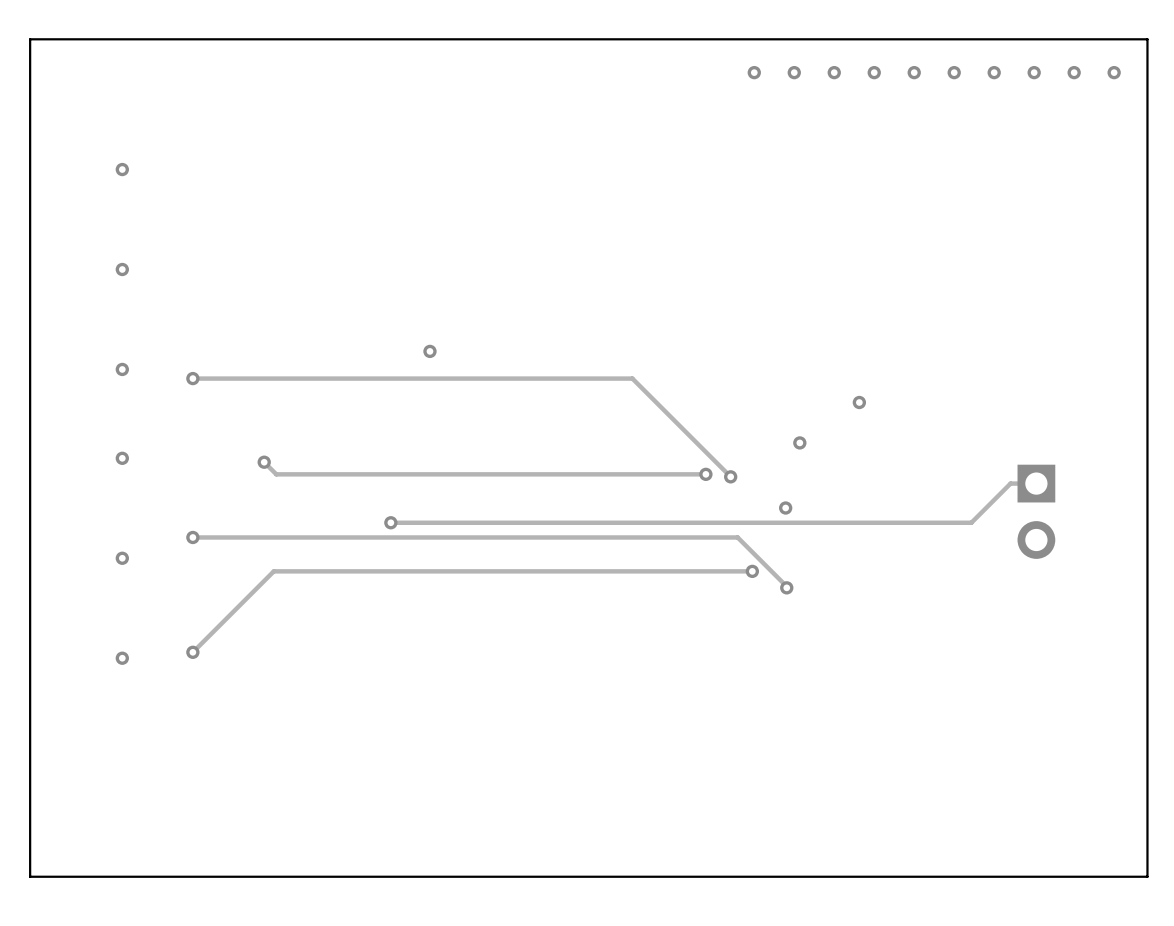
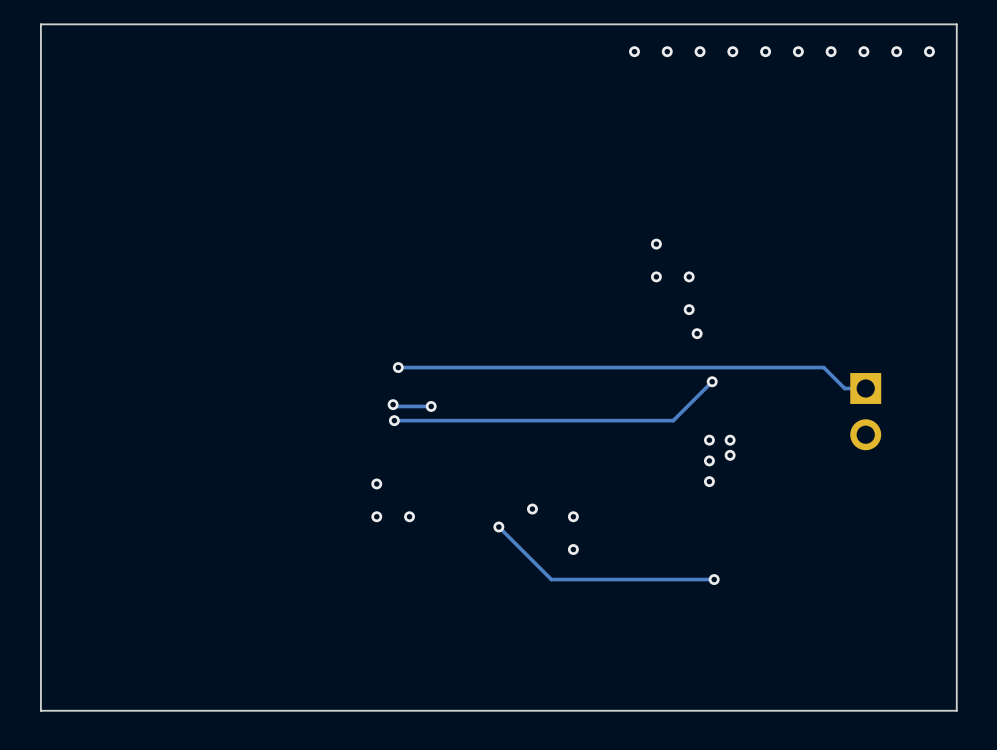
via: (122, 169) -> none
via: (122, 269) -> none
via: none -> (656, 244)
via: none -> (656, 276)
via: none -> (689, 276)
via: (429, 351) -> none
via: (122, 369) -> none
track: (192, 378) (632, 378) (730, 476) -> none
via: (192, 378) -> none
via: none -> (689, 309)
via: (859, 402) -> none
via: none -> (697, 333)
via: (799, 442) -> none
via: (122, 458) -> none
via: none -> (398, 367)
track: (264, 462) (276, 474) (705, 474) -> none
via: (264, 462) -> none
via: (705, 474) -> none
track: none -> (712, 381) (673, 420) (394, 420)
via: none -> (712, 381)
via: (730, 476) -> none
track: (1010, 483) (971, 522) (390, 522) -> (844, 388) (823, 367) (398, 367)
track: none -> (393, 404) (394, 406) (431, 406)
via: none -> (393, 404)
via: none -> (431, 406)
via: (785, 508) -> none
via: (390, 522) -> none
via: none -> (394, 420)
track: (192, 537) (737, 537) (786, 587) -> none
via: (192, 537) -> none
via: none -> (709, 440)
via: none -> (730, 440)
via: (122, 558) -> none
via: none -> (730, 455)
track: (752, 571) (273, 571) (192, 652) -> none
via: (752, 571) -> none
via: none -> (709, 460)
via: (786, 587) -> none
via: none -> (709, 481)
via: none -> (376, 483)
via: none -> (532, 509)
via: none -> (376, 516)
via: none -> (409, 516)
via: none -> (573, 516)
via: (192, 652) -> none
track: none -> (498, 526) (551, 579) (714, 579)
via: none -> (498, 526)
via: (122, 658) -> none
via: none -> (573, 549)
via: none -> (714, 579)

